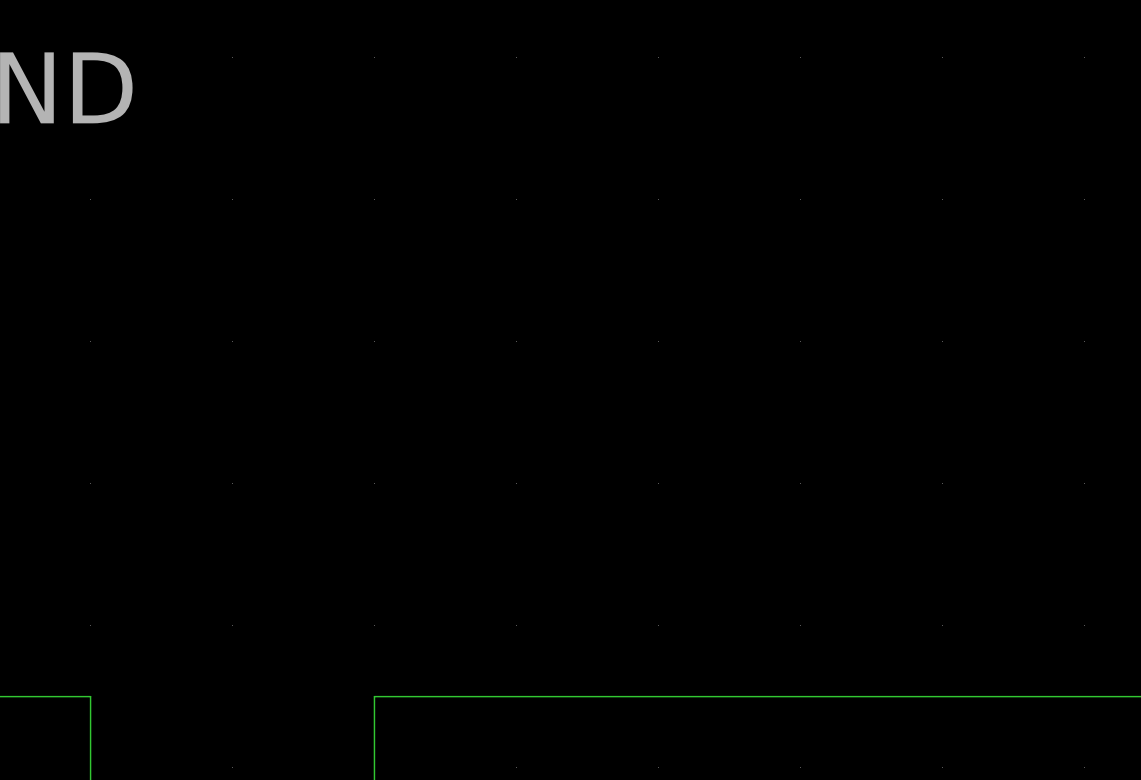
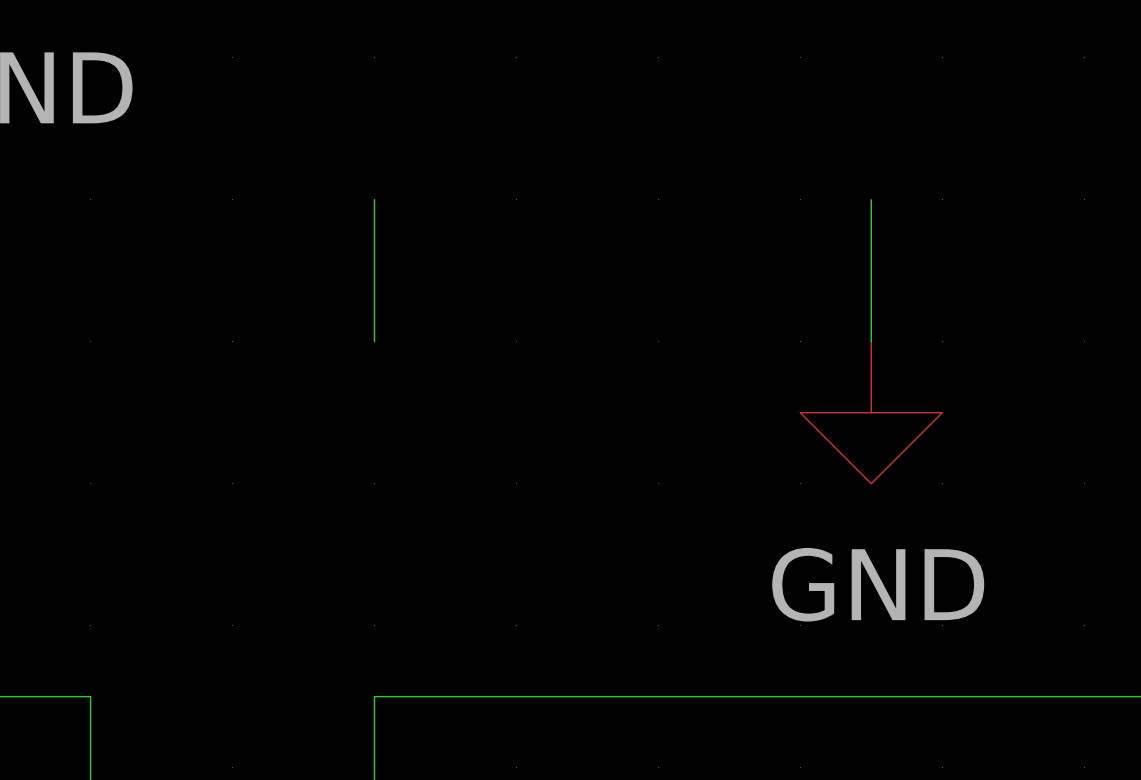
wire: none -> (374, 199) (374, 341)
wire: none -> (871, 199) (871, 341)
power symbol: none -> GND (871, 412)

